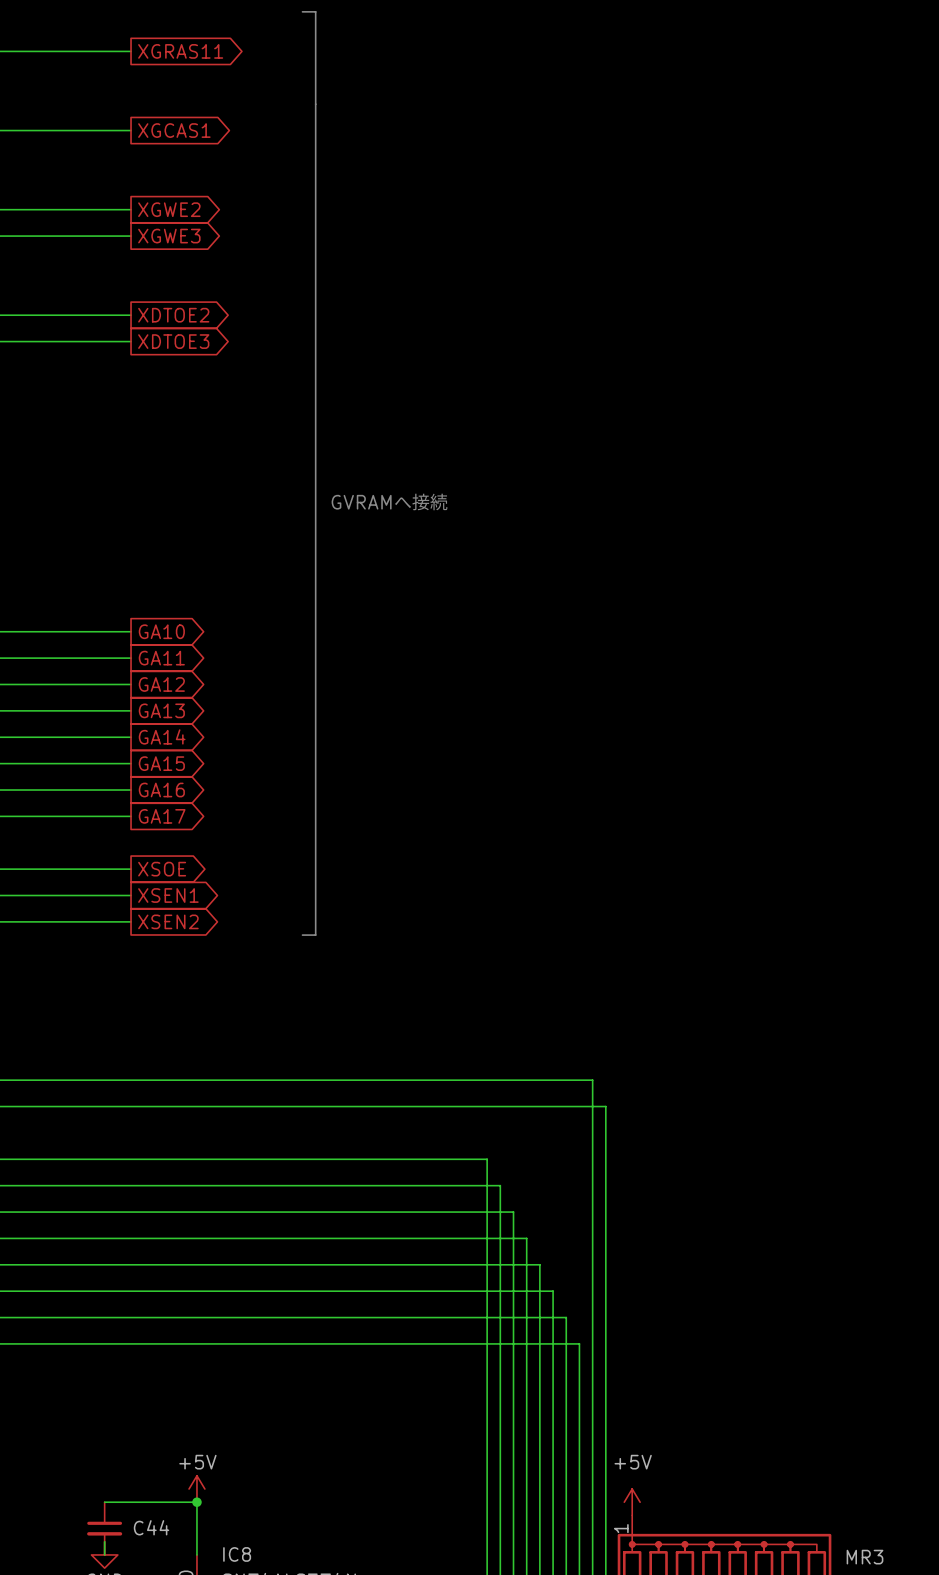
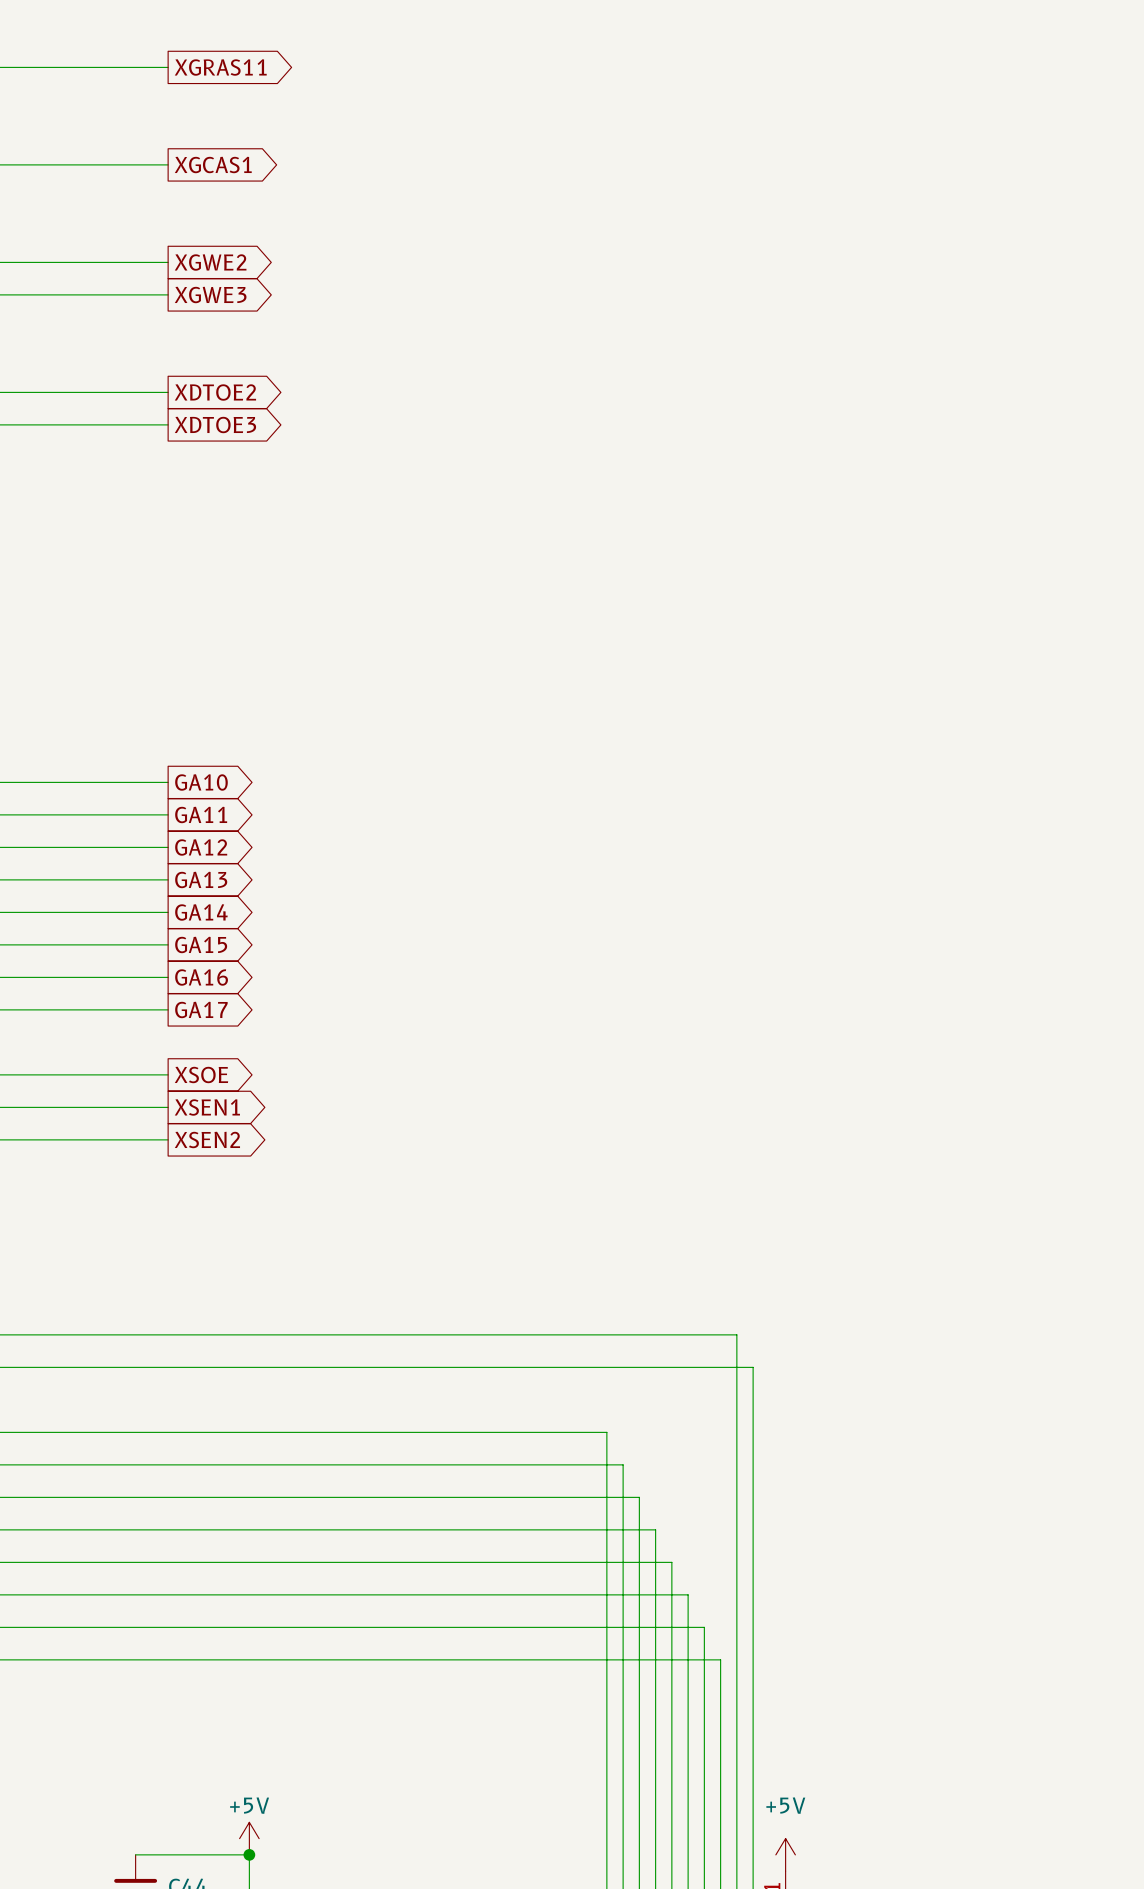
line: (302, 11) (315, 11) (315, 935) (302, 935) -> none
text: GVRAMへ接続 (389, 501) -> none

